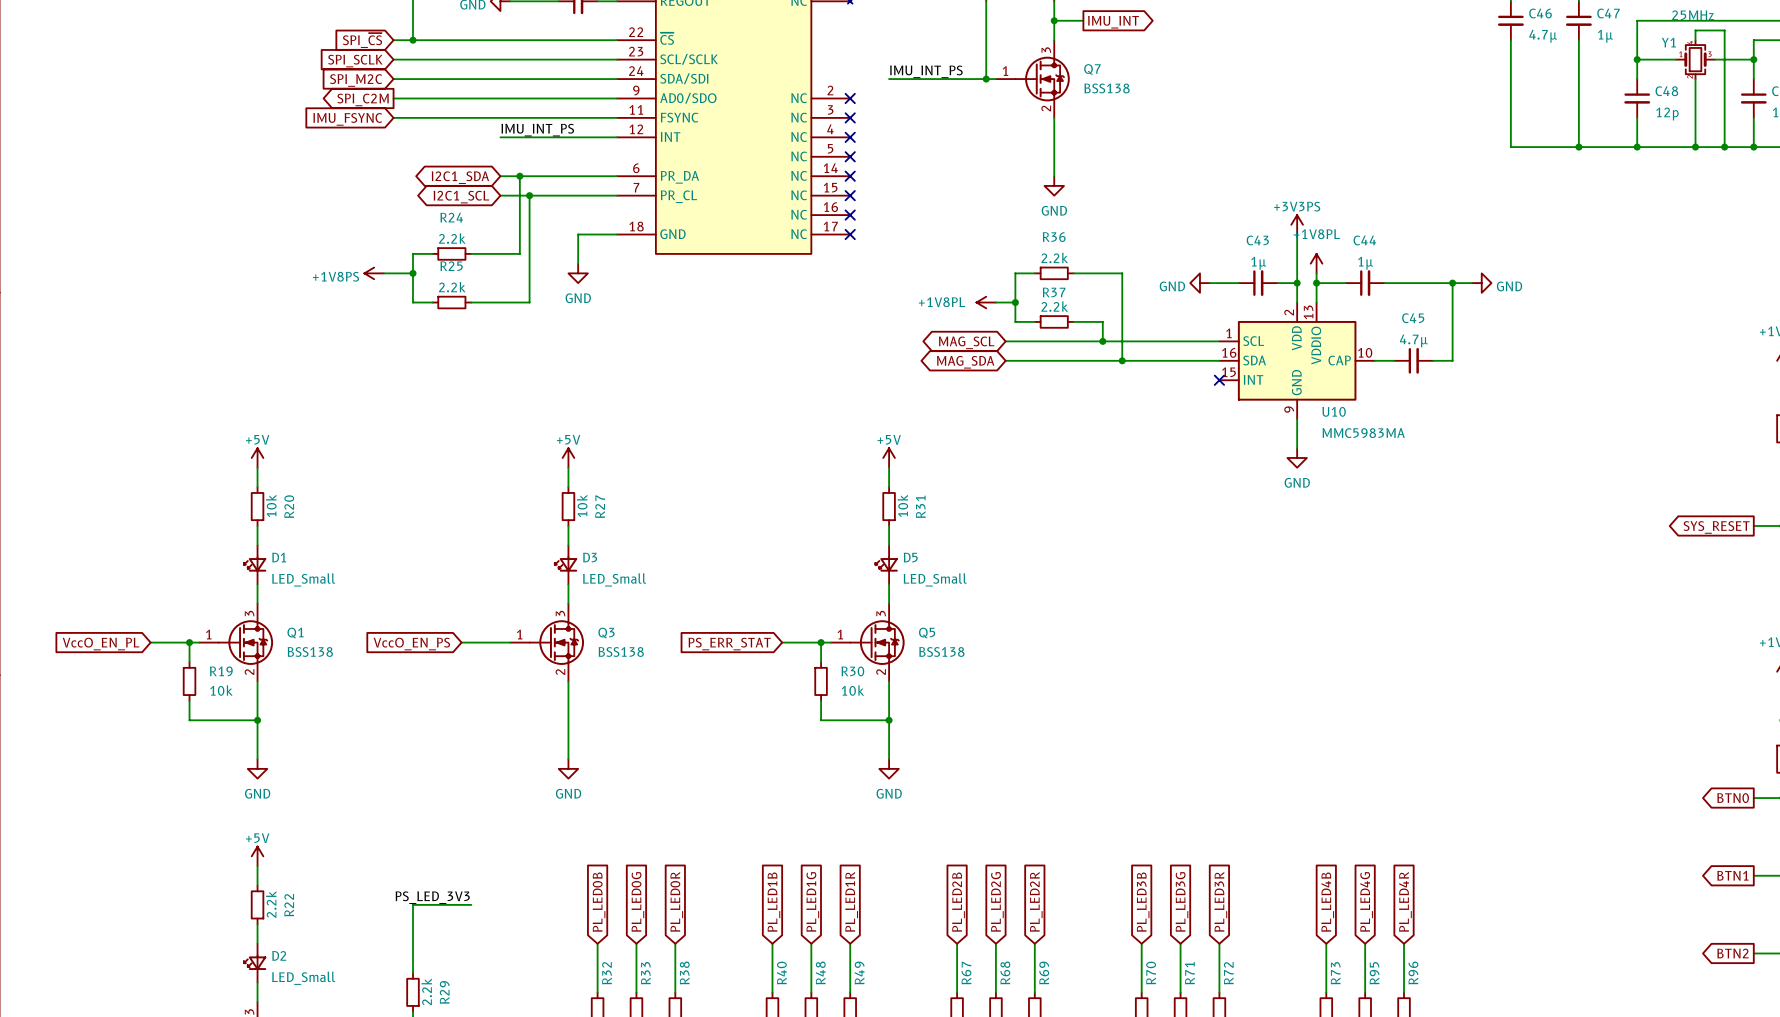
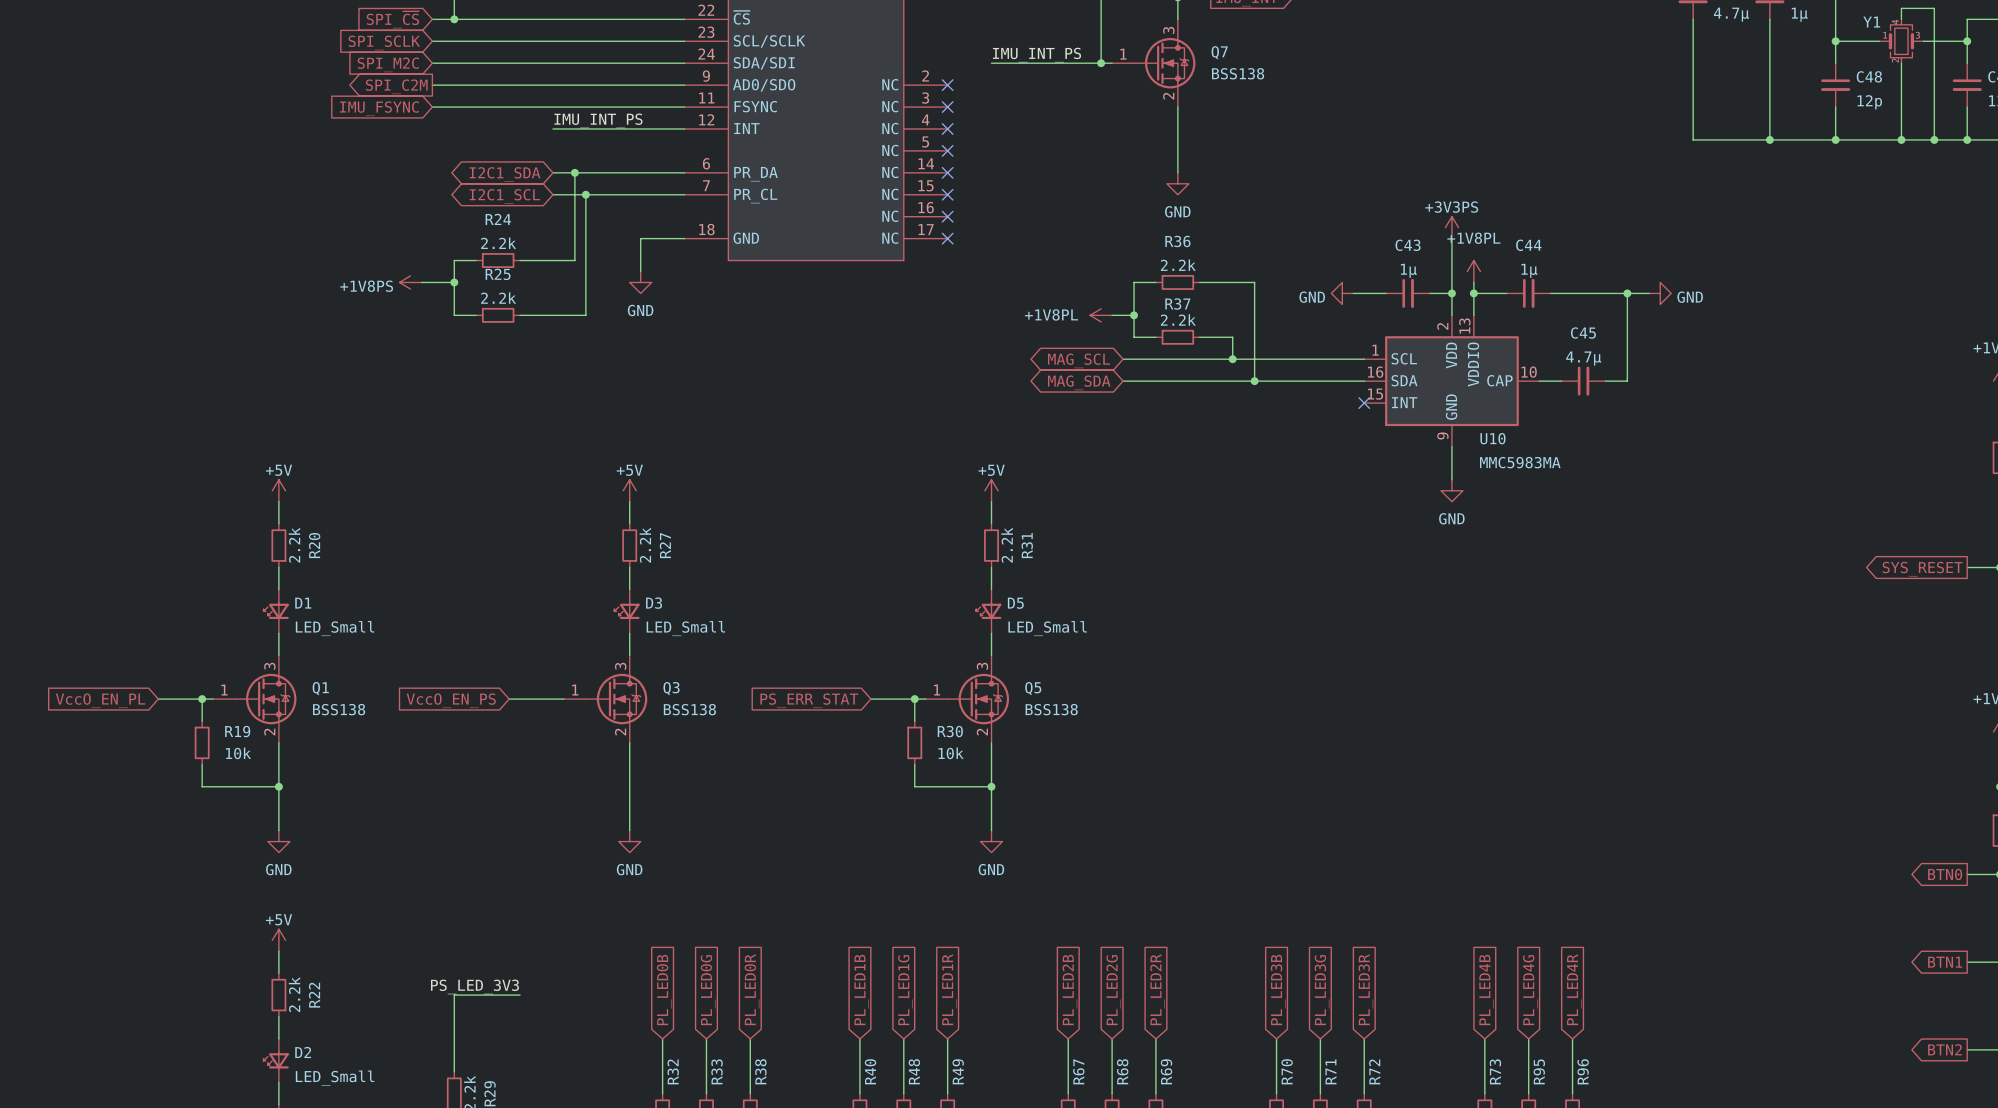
R20 value: 10k (271, 505) -> 2.2k (294, 545)
R27 value: 10k (582, 505) -> 2.2k (645, 545)
R31 value: 10k (902, 505) -> 2.2k (1007, 545)

